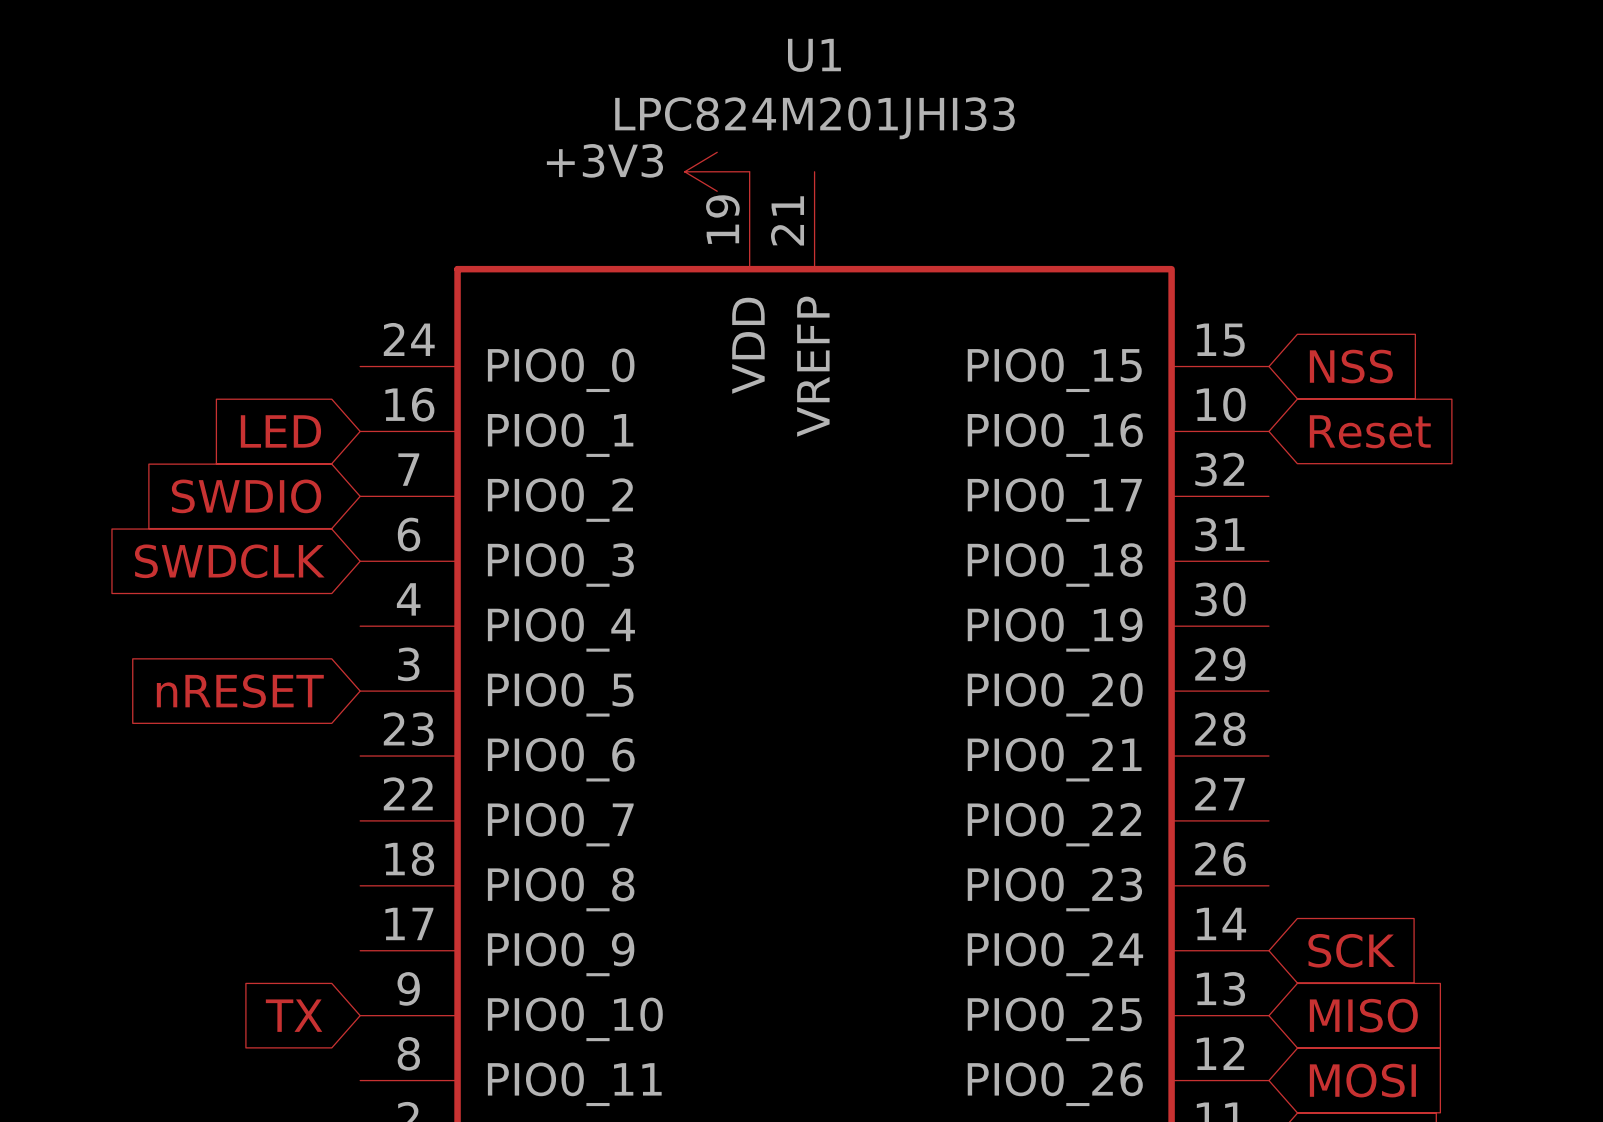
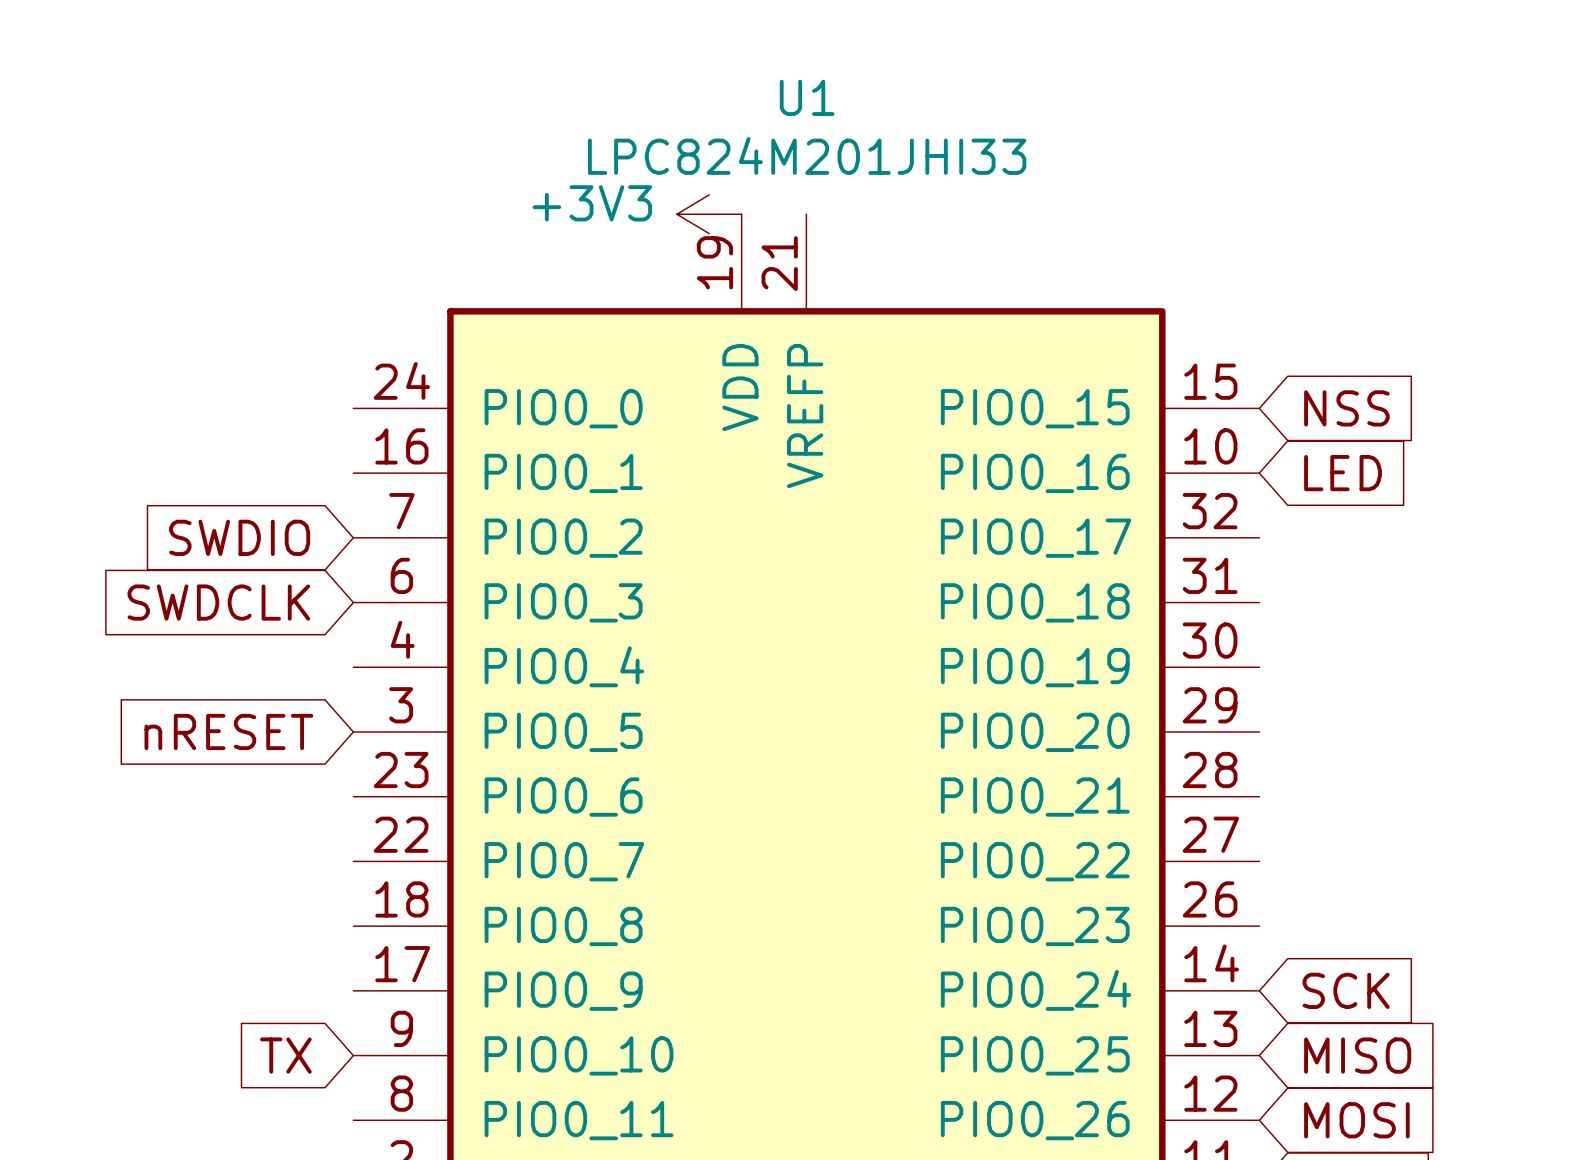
global label: LED (280, 431) -> none
global label: Reset (1370, 431) -> LED (1343, 473)

